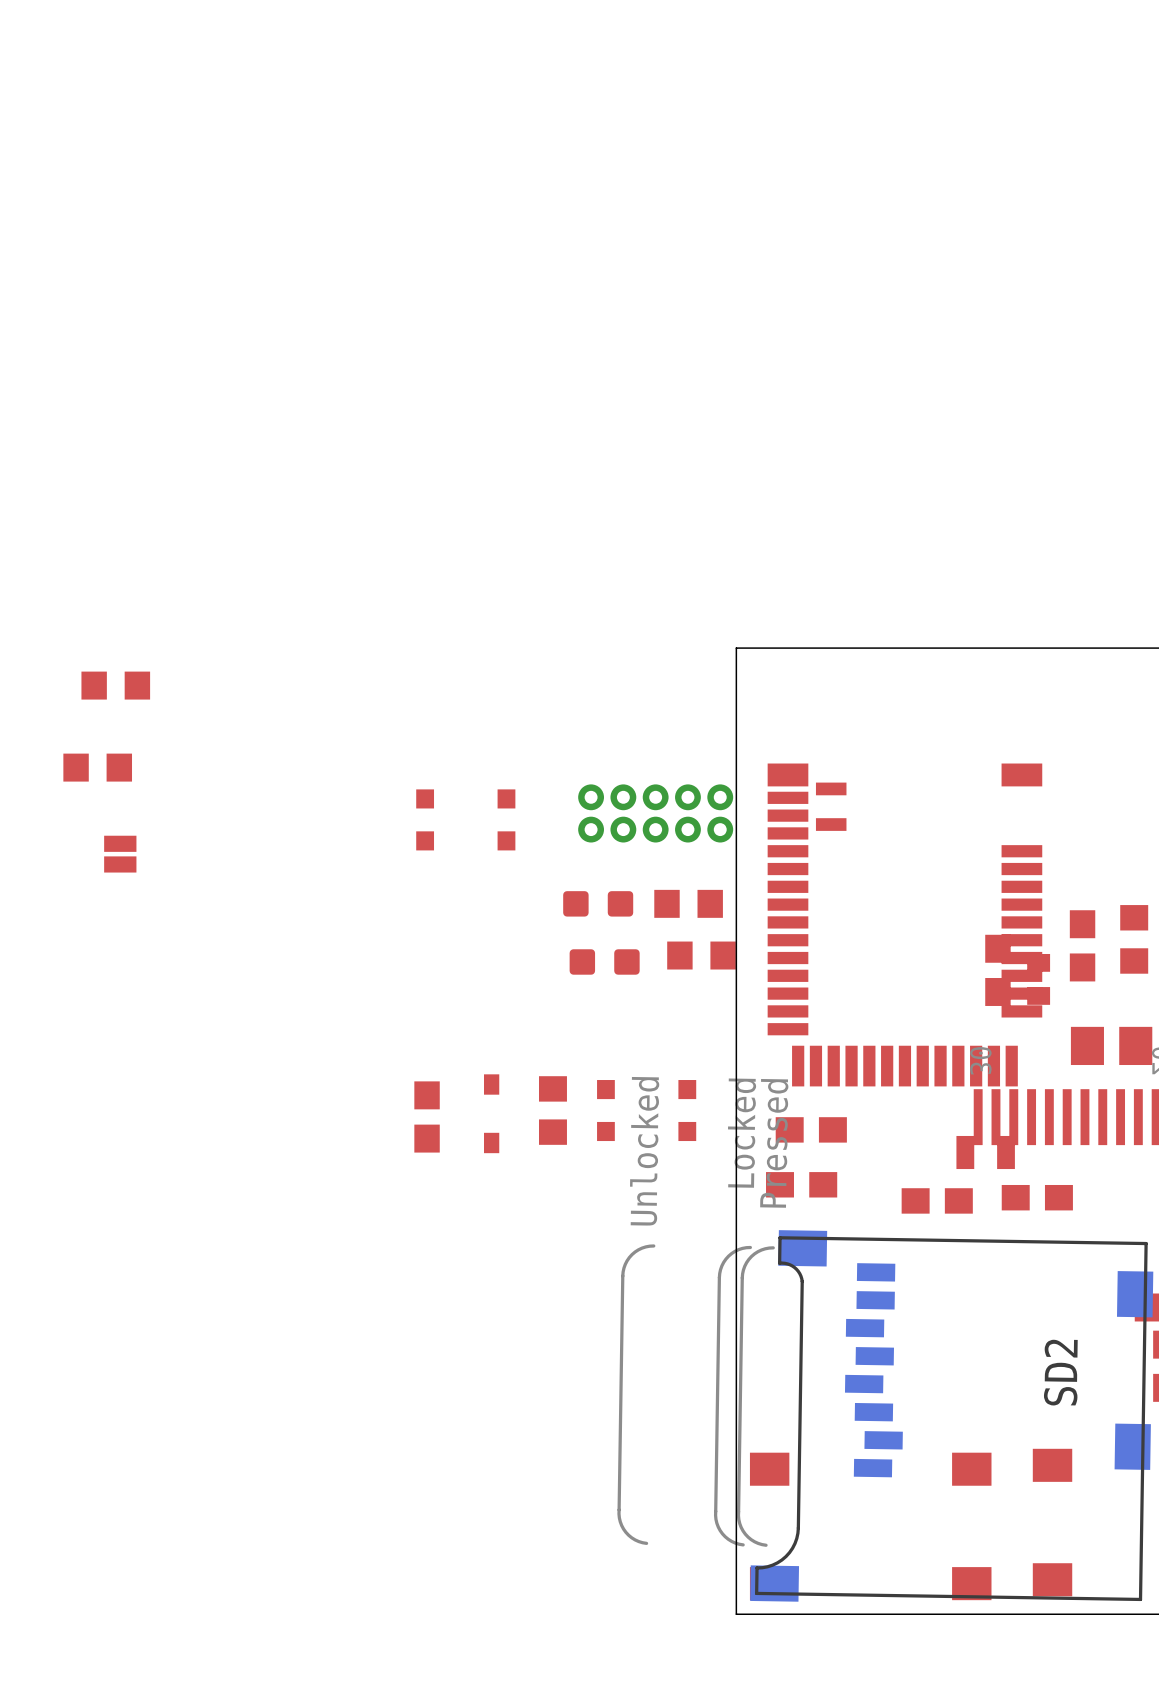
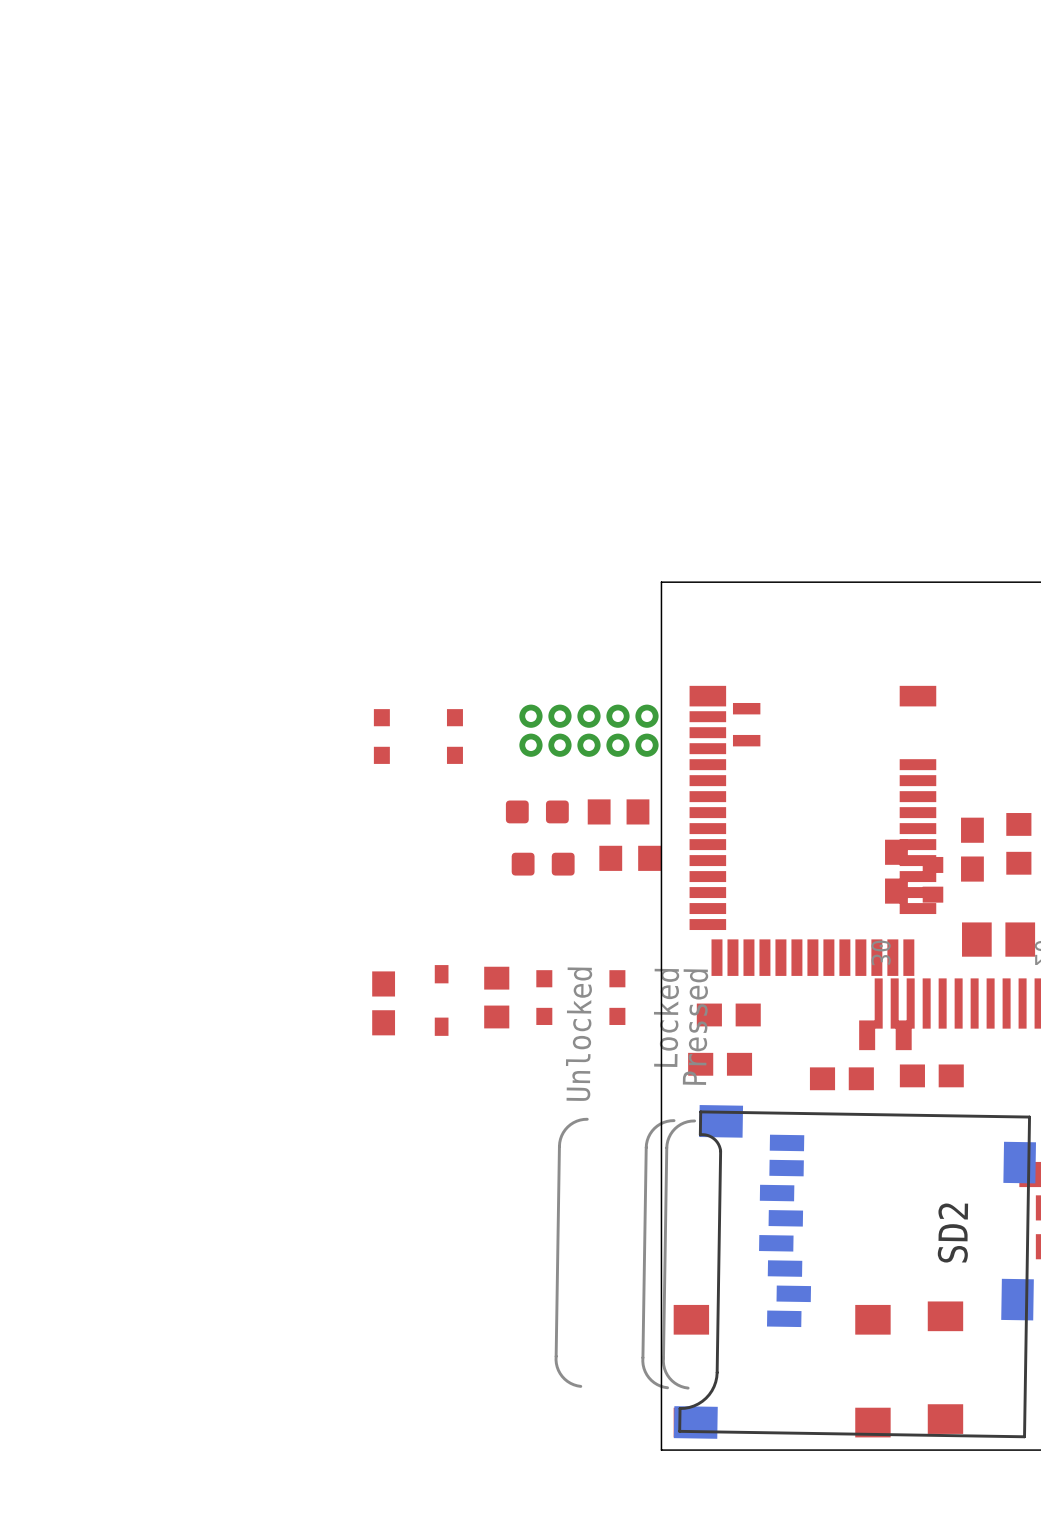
part: (115, 685) -> none
part: (97, 767) -> none
part: (120, 854) -> none

